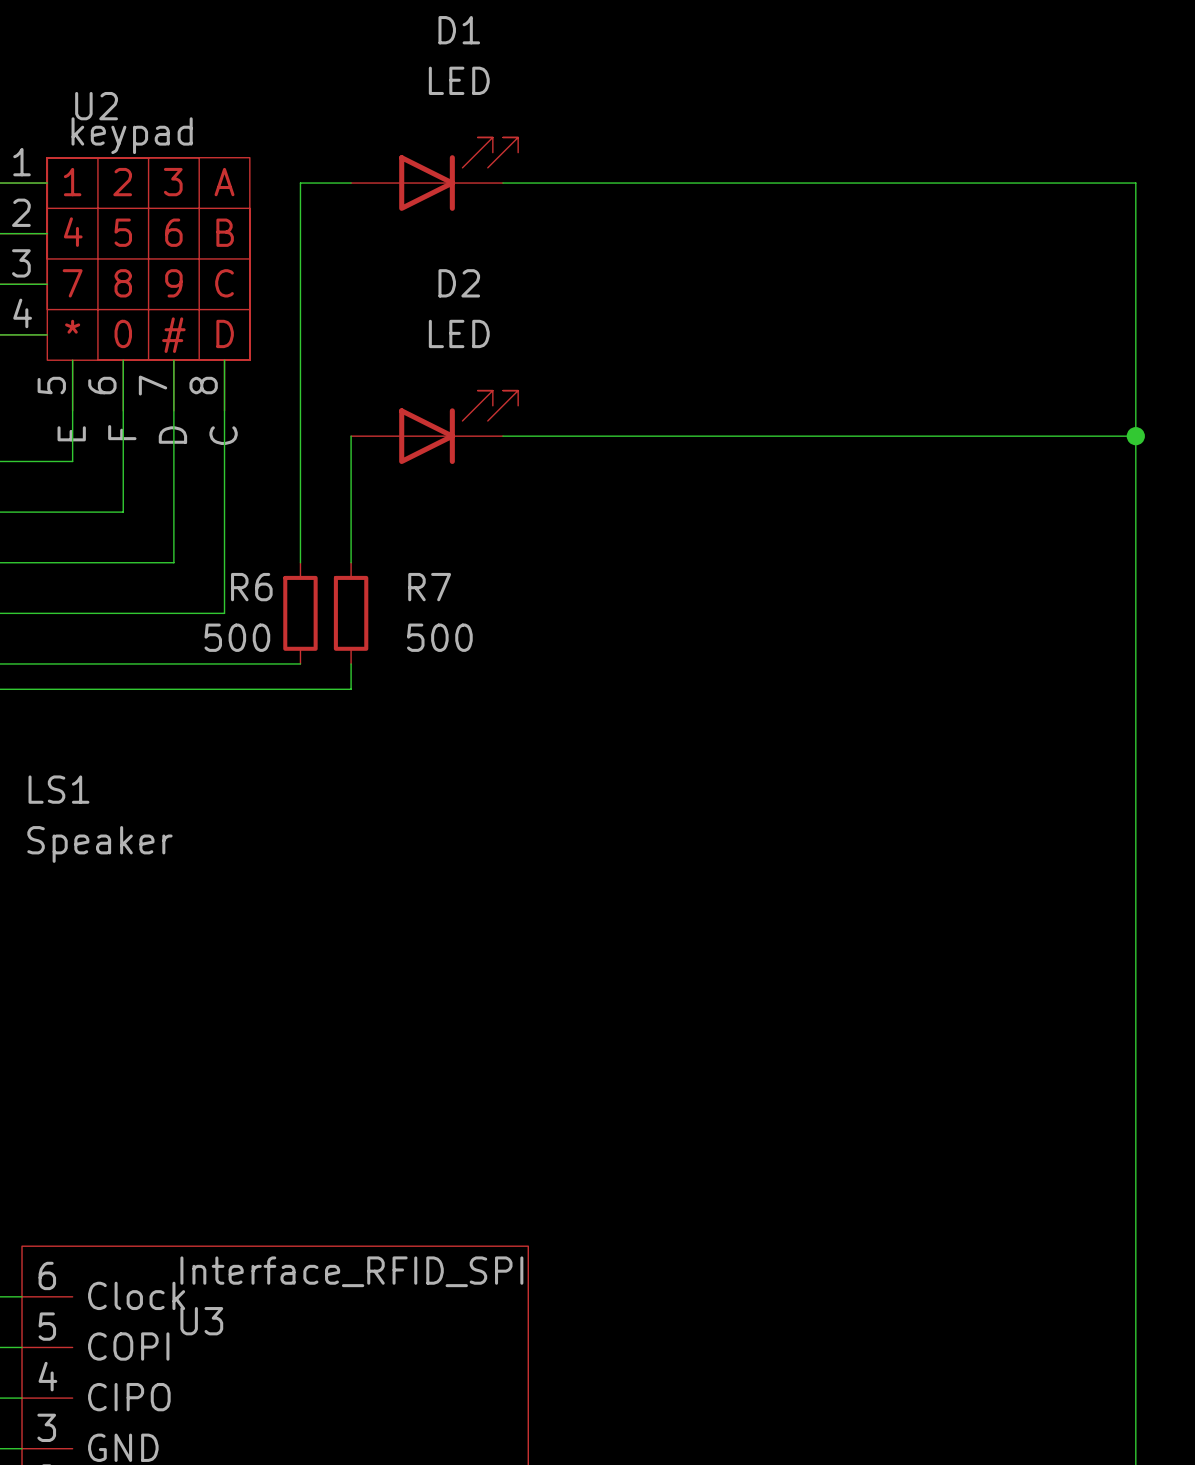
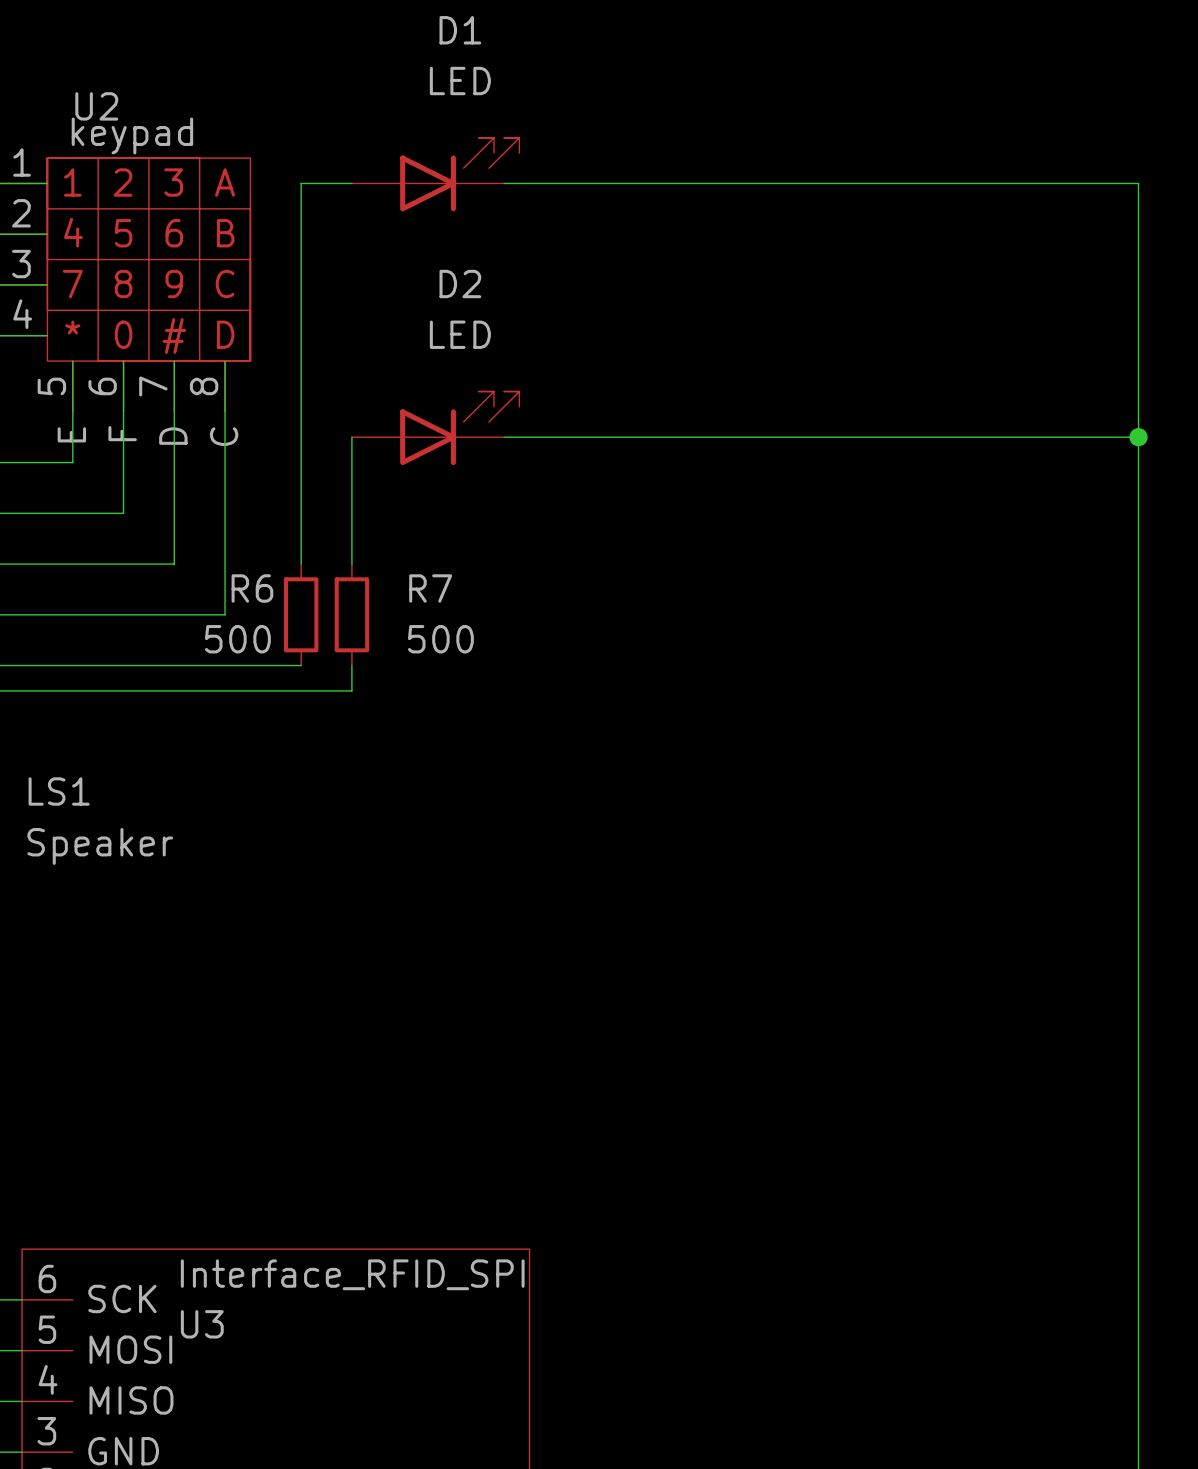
U3 pin name: Clock (136, 1295) -> SCK (122, 1298)
U3 pin name: COPI (128, 1346) -> MOSI (130, 1349)
U3 pin name: CIPO (129, 1397) -> MISO (131, 1400)

